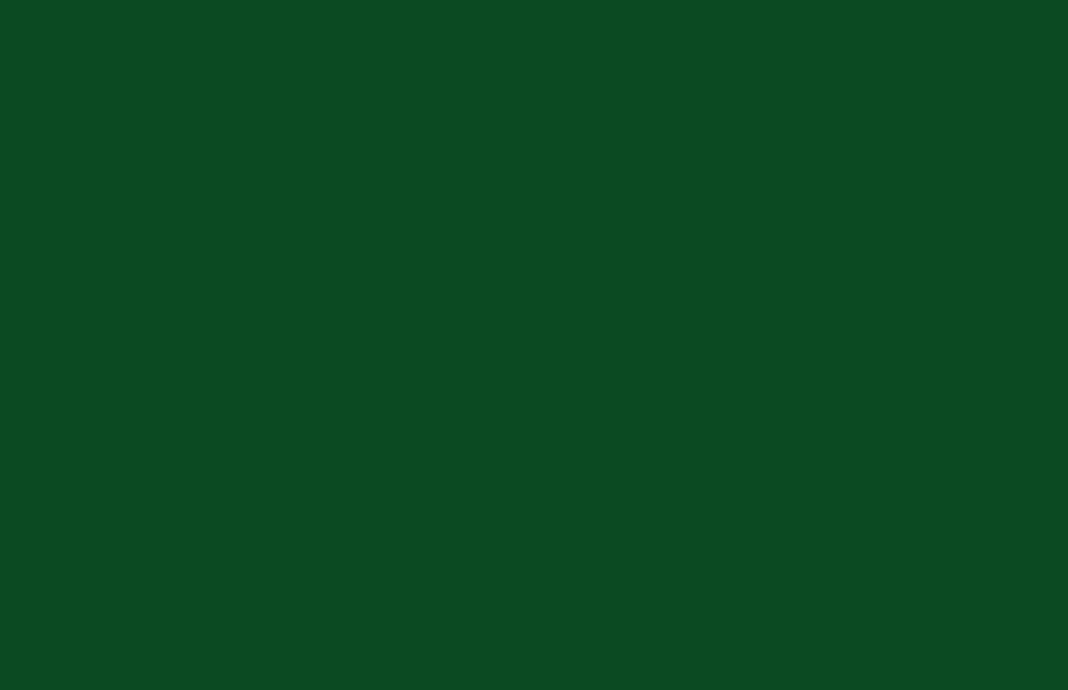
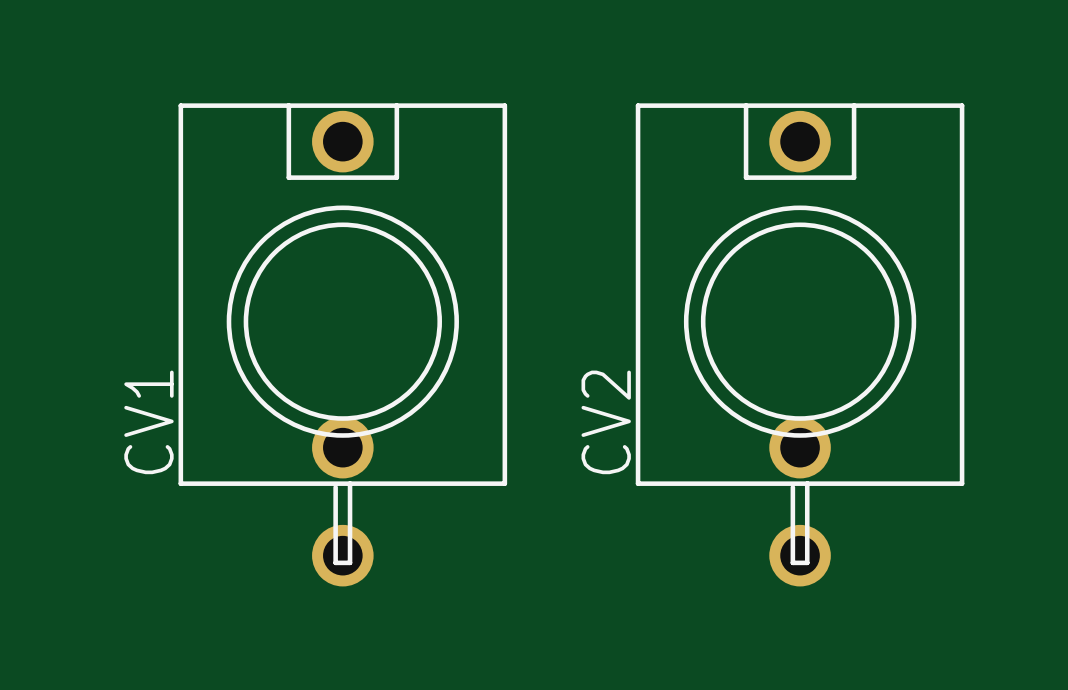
CV1: none -> (342, 344)
CV2: none -> (800, 344)

